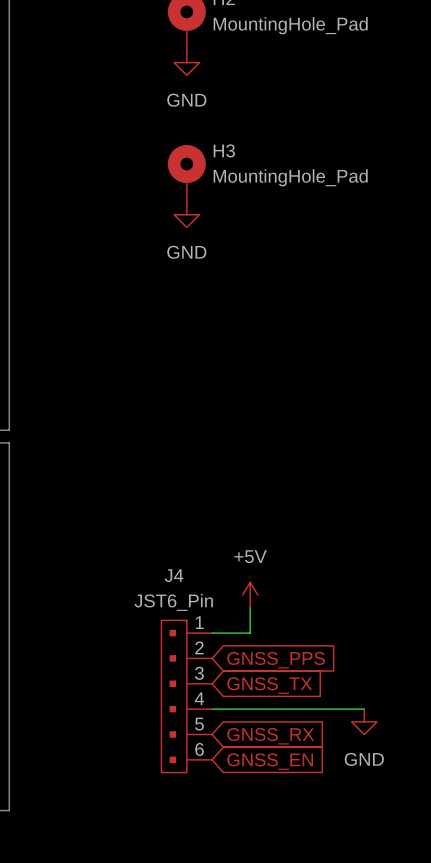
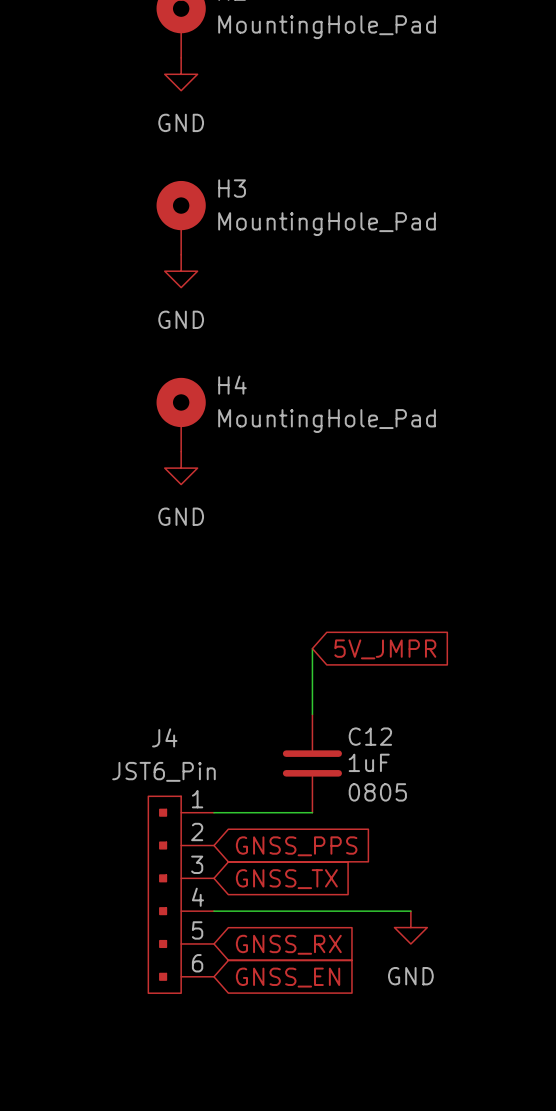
H4: none -> MountingHole_Pad (181, 414)
power symbol: none -> GND (181, 468)
wire: none -> (312, 648) (312, 714)
global label: none -> 5V_JMPR (385, 649)
power symbol: +5V (250, 595) -> none
C12: none -> 1uF (312, 763)
wire: (250, 607) (250, 633) -> (312, 812) (263, 812)

